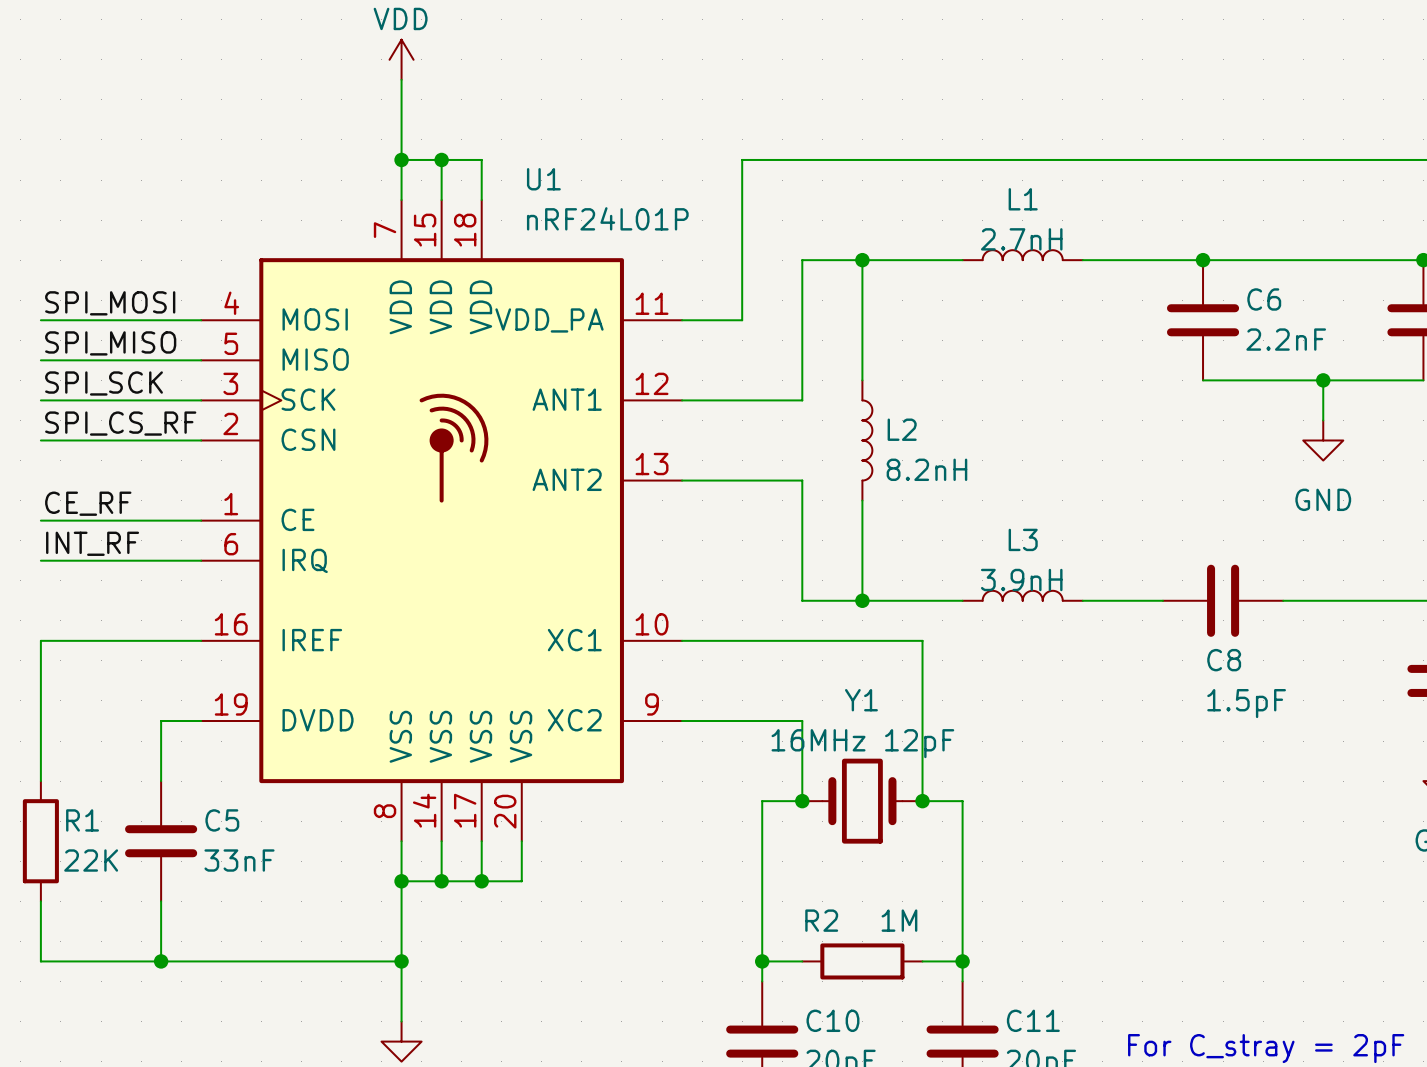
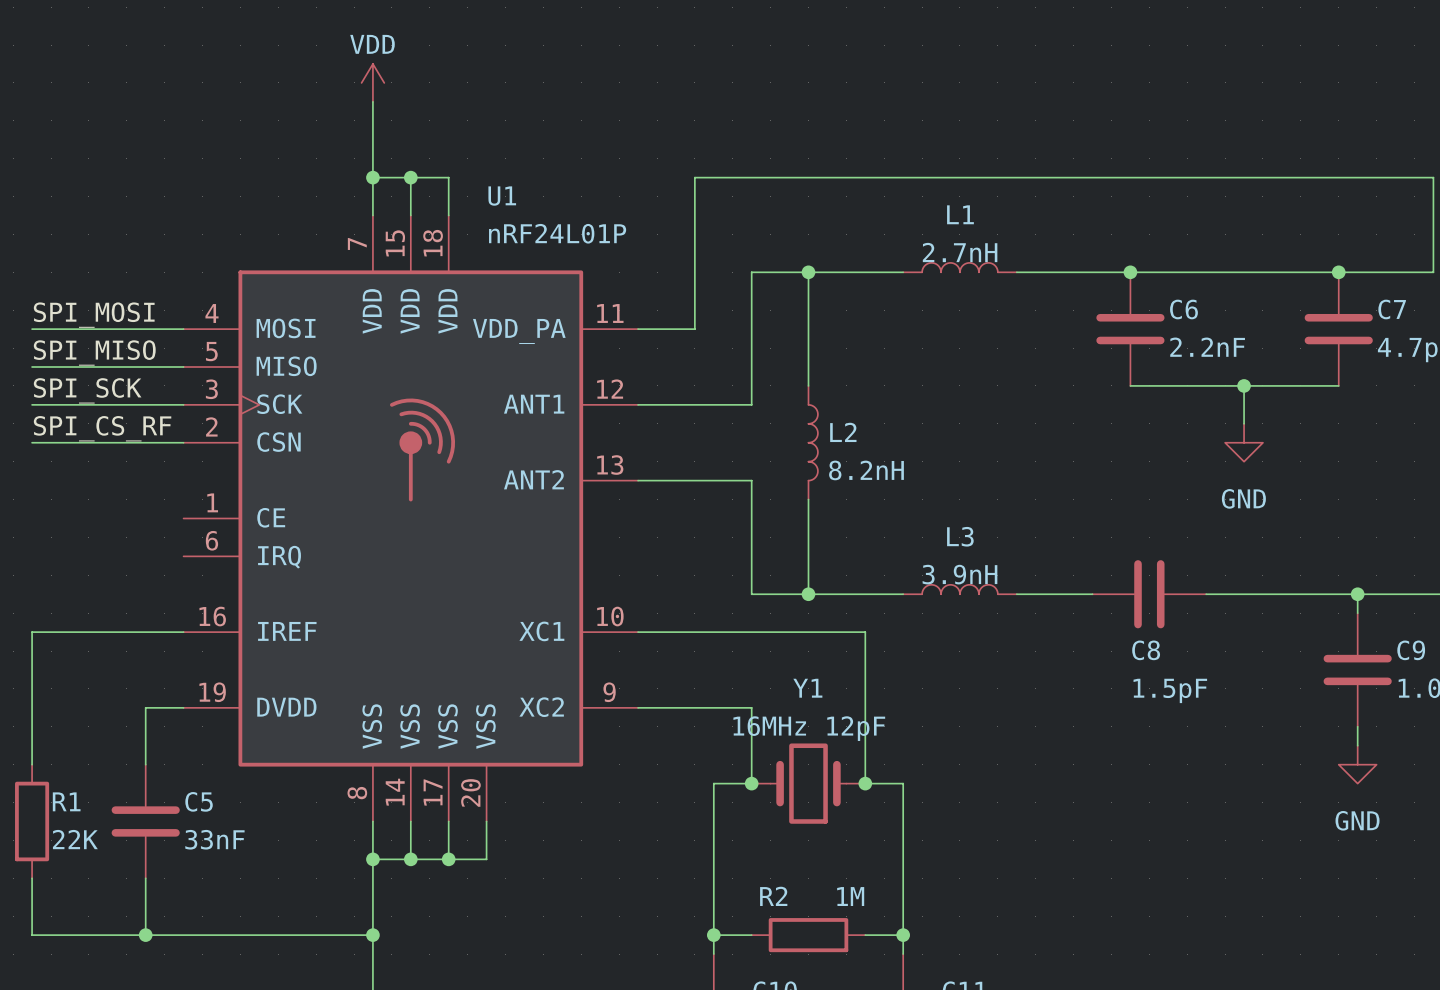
label: CE_RF (88, 503) -> none
wire: (40, 520) (201, 520) -> none
label: INT_RF (92, 543) -> none
wire: (40, 560) (201, 560) -> none

